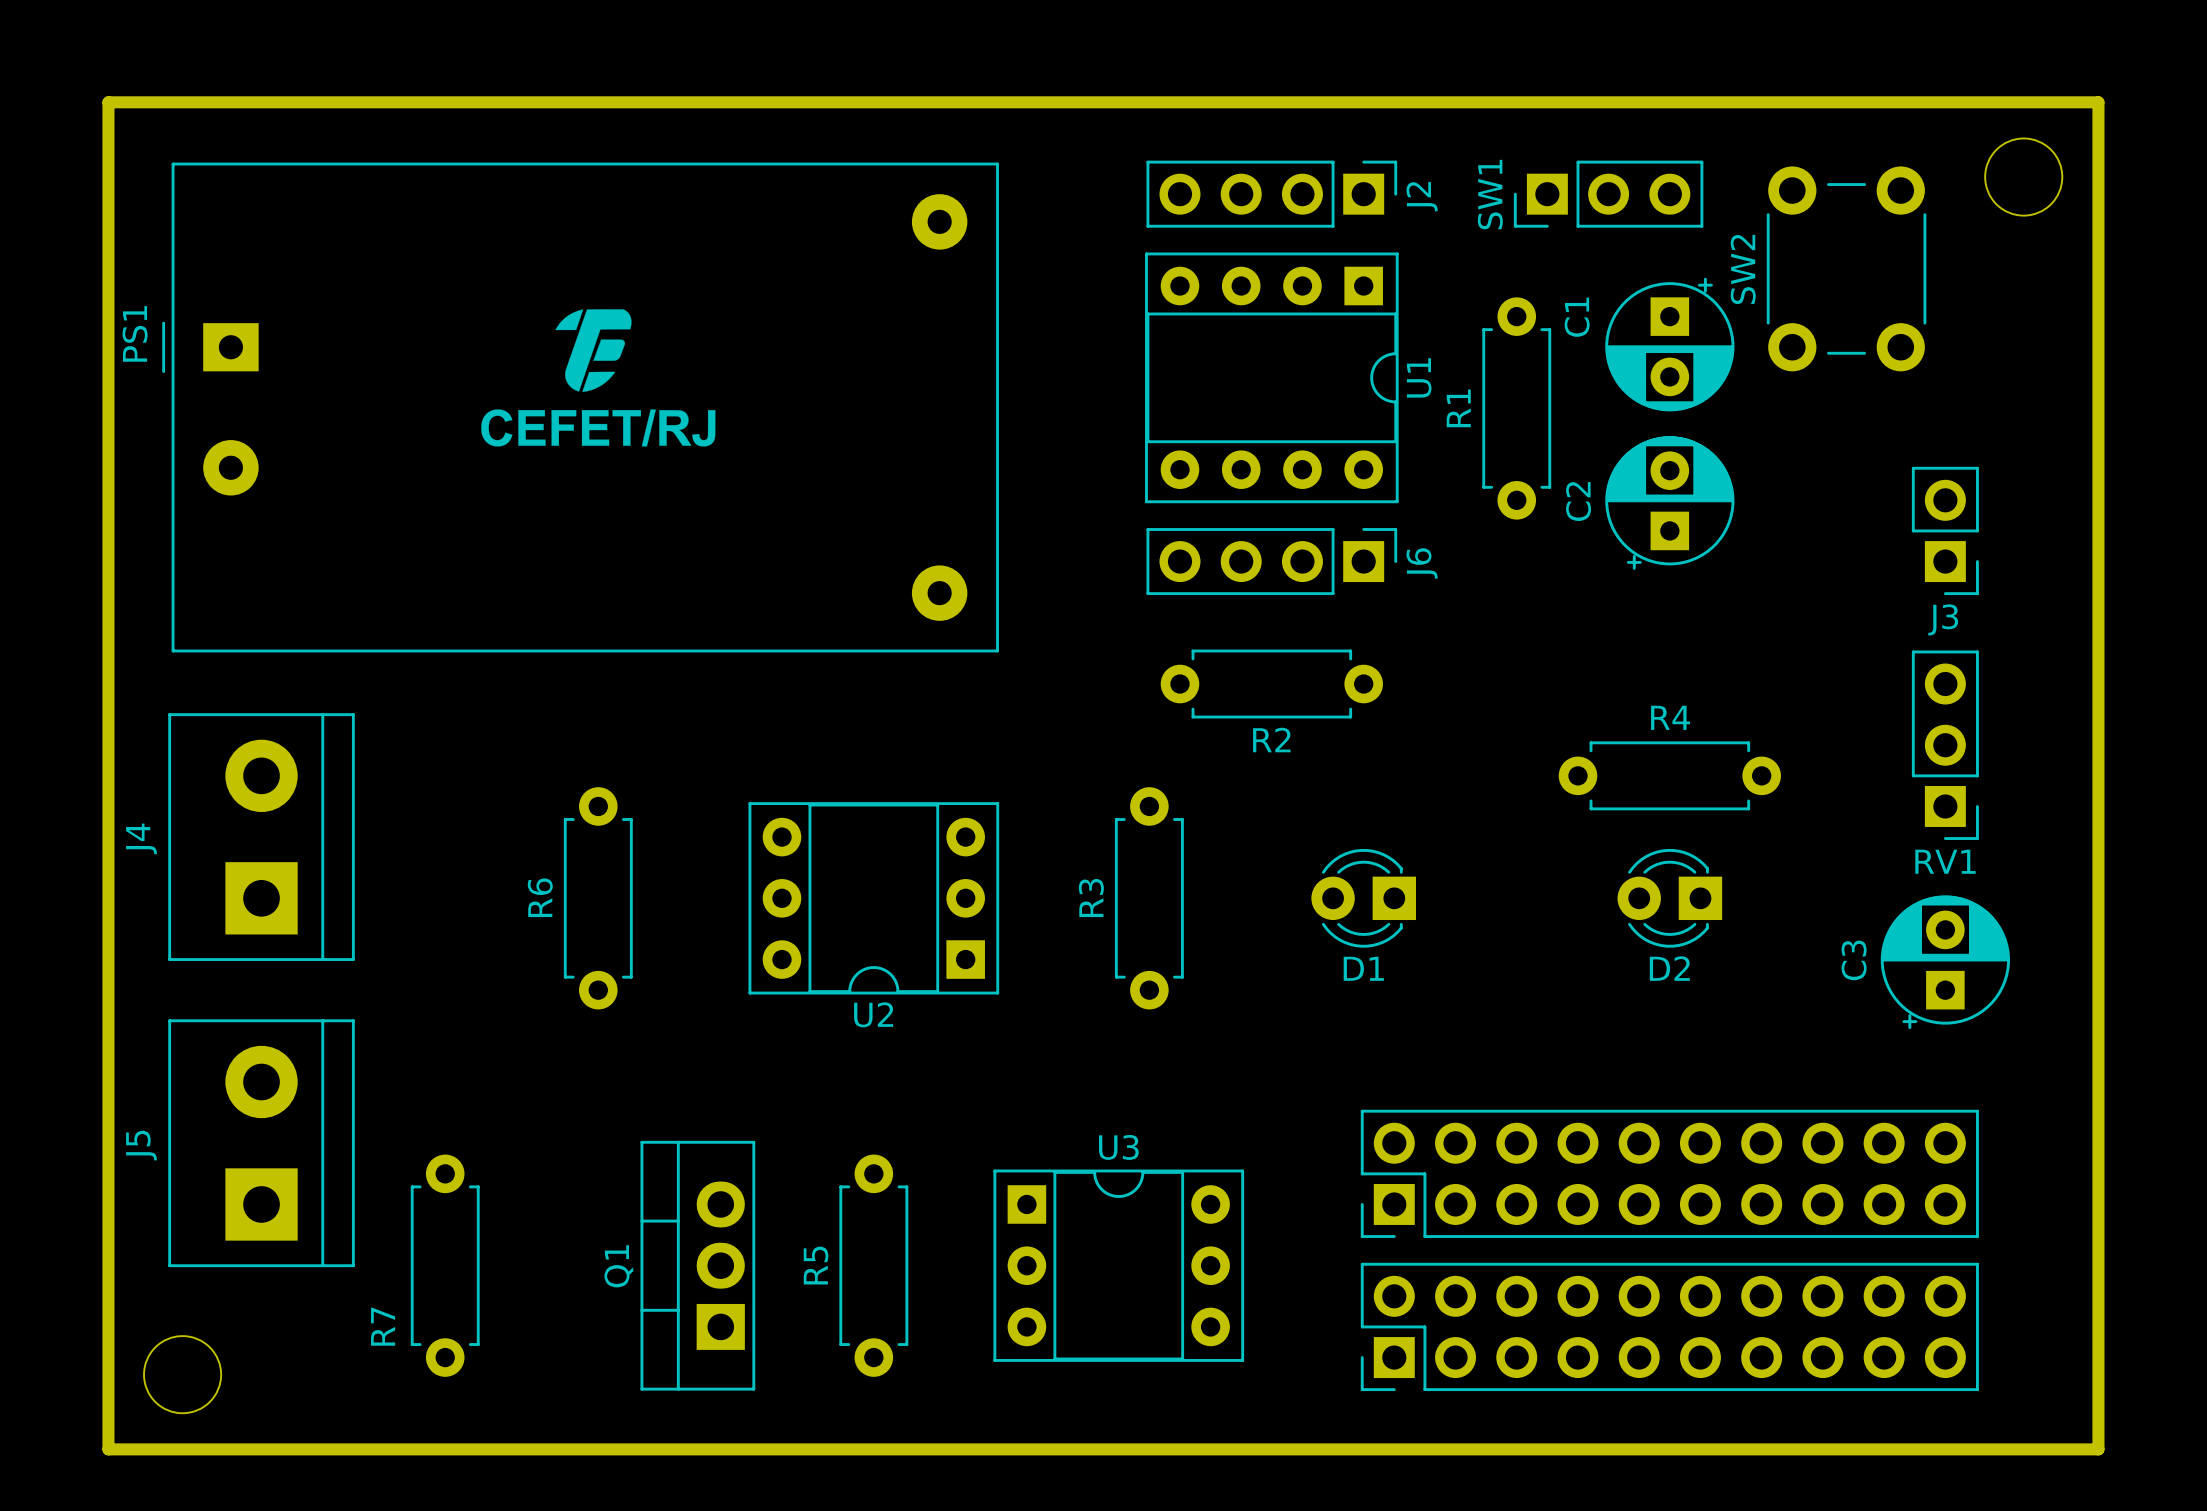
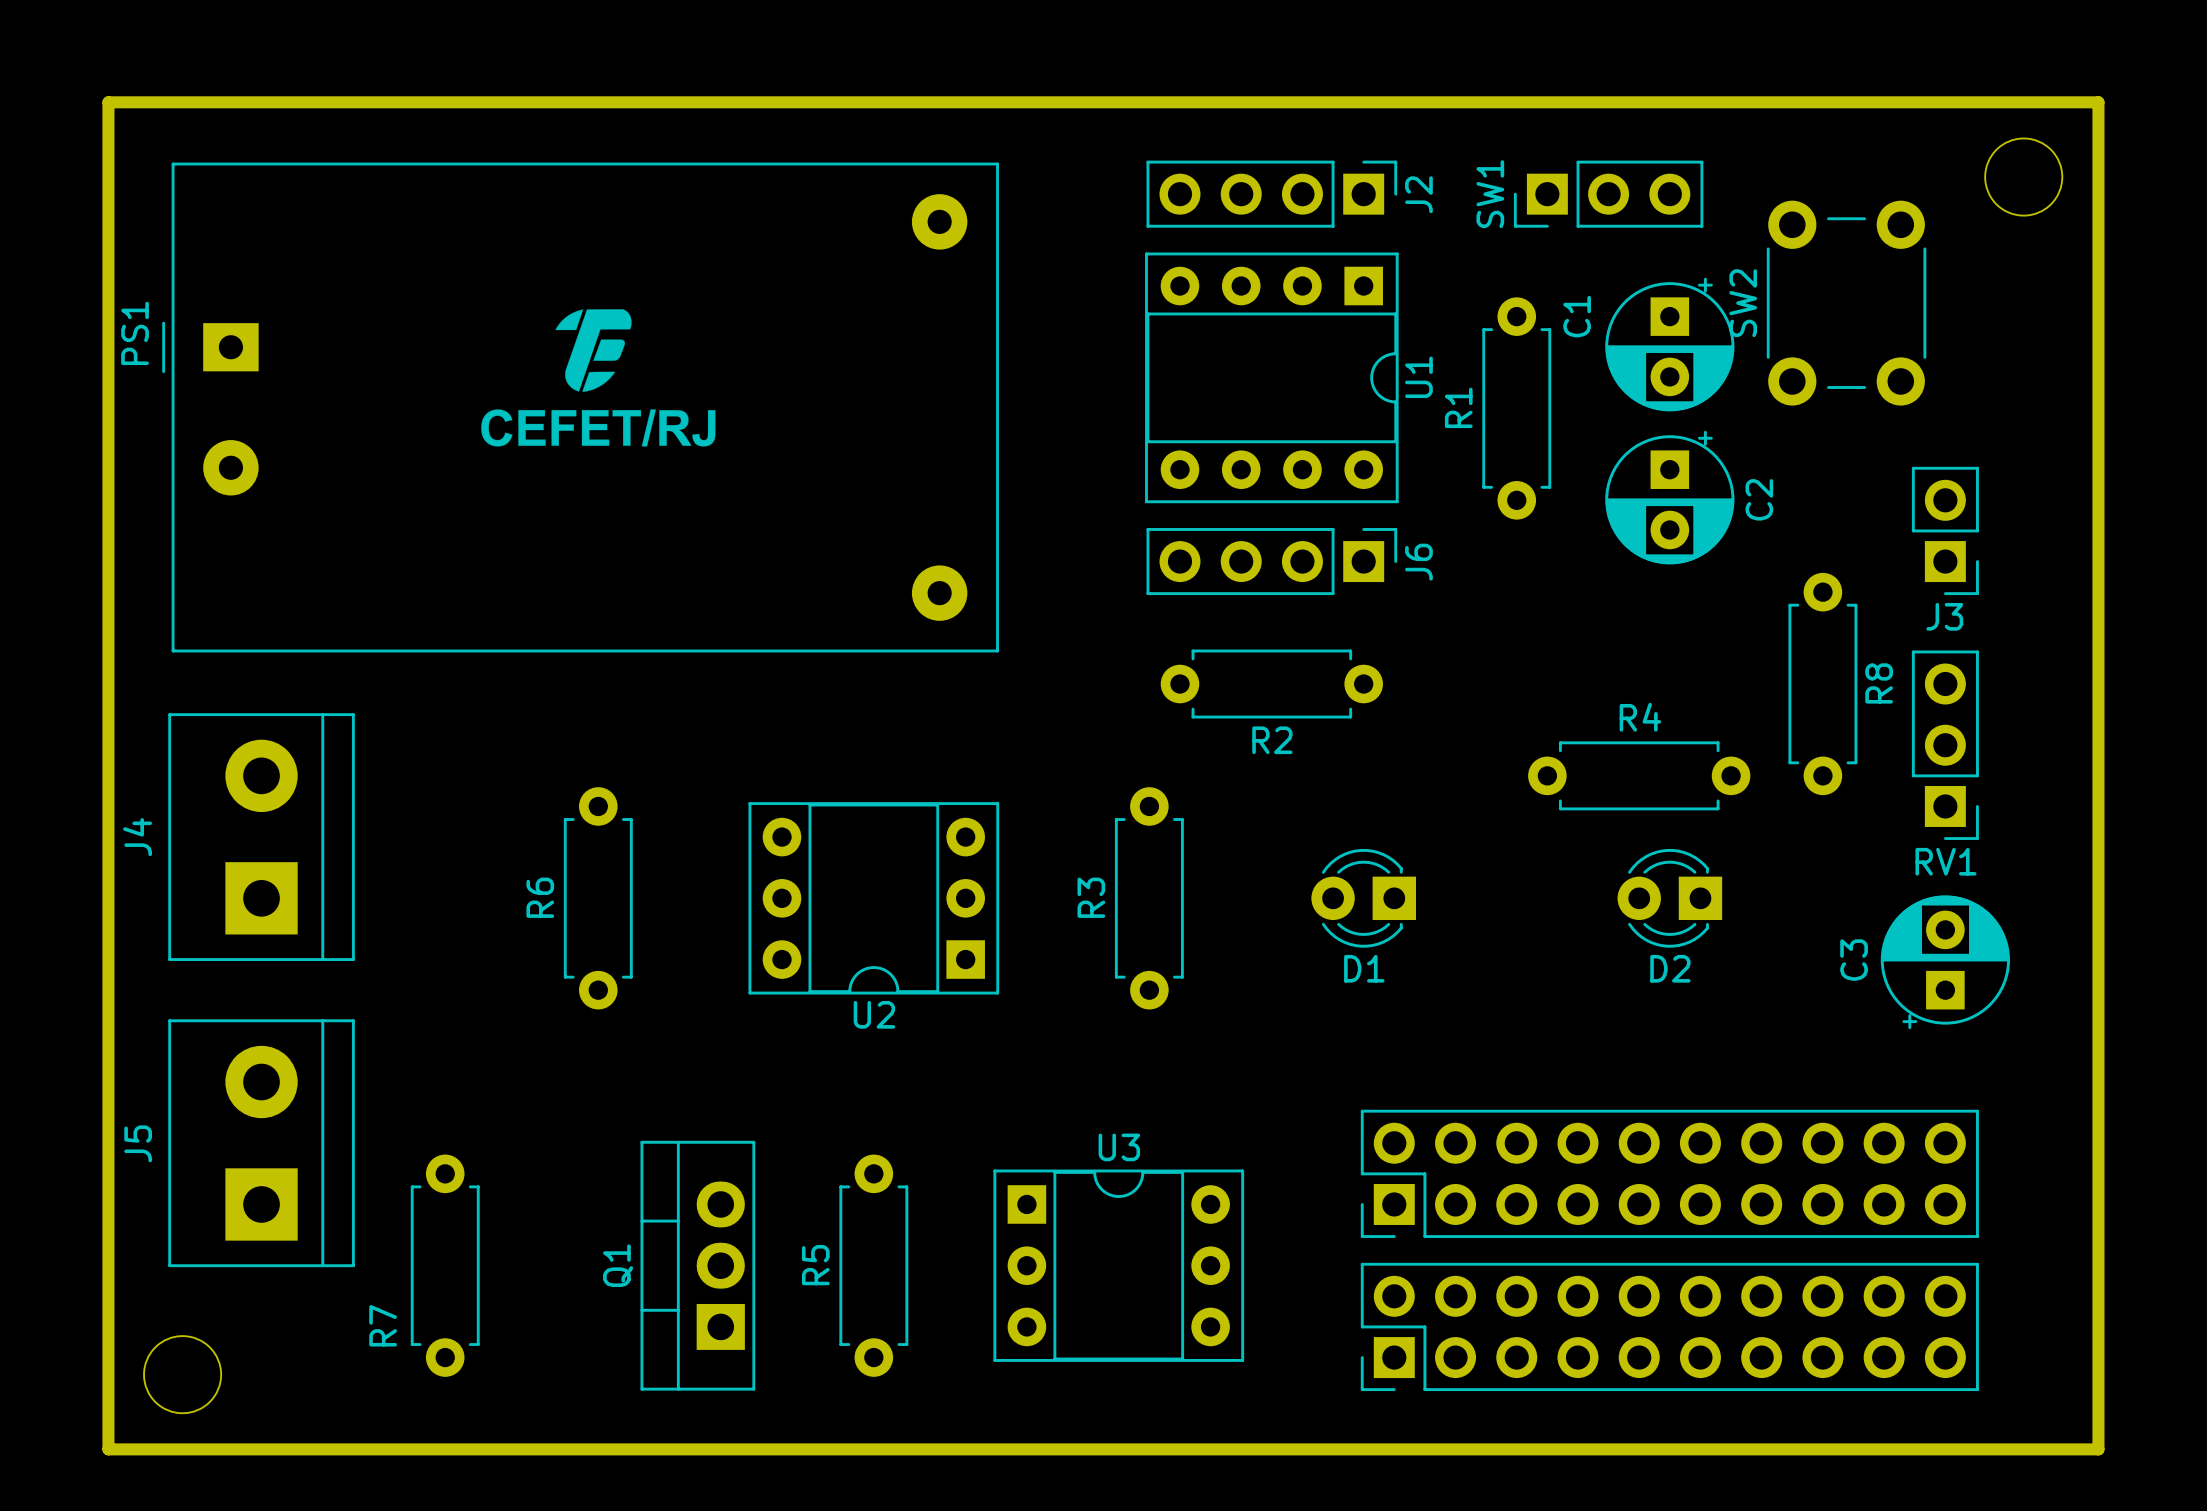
SW2 position: (1846, 268) -> (1846, 303)
C2 rotation: 0° (1669, 503) -> 180° (1669, 497)
R8: none -> (1822, 684)
R4 position: (1669, 775) -> (1639, 775)

